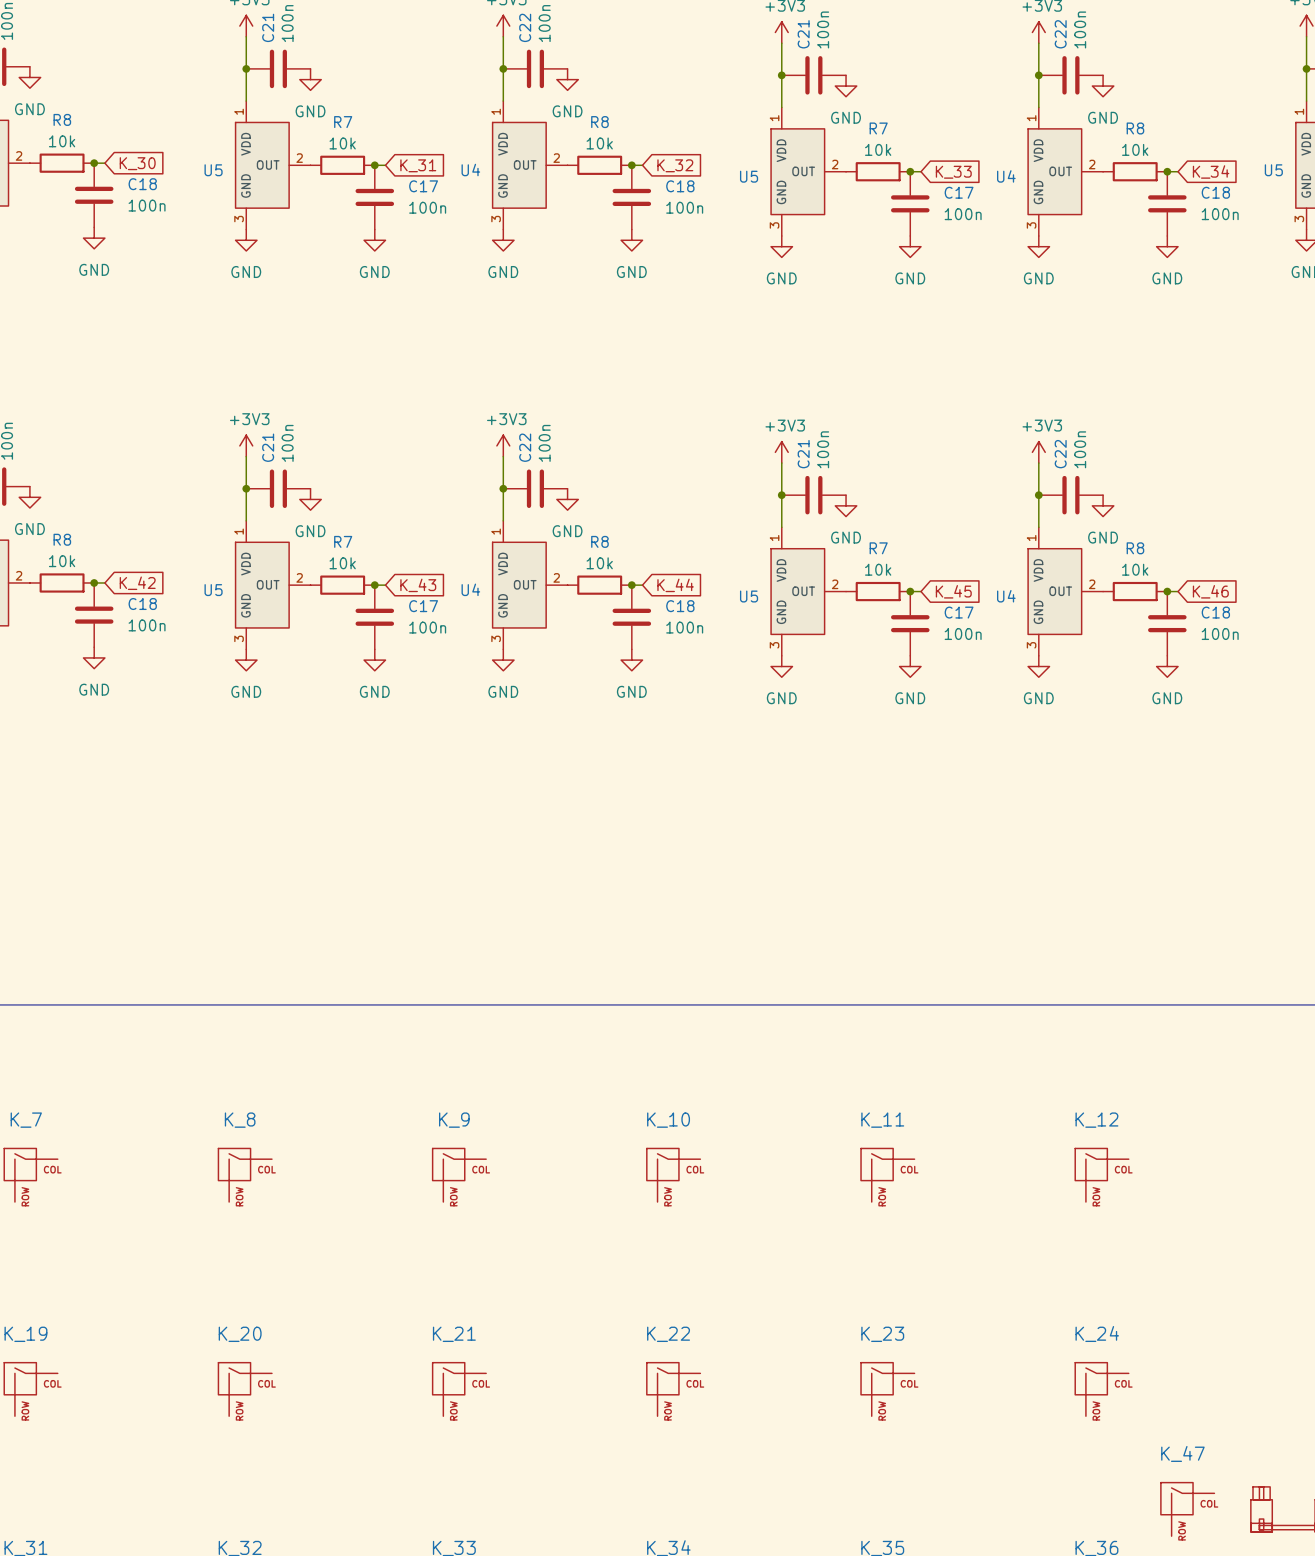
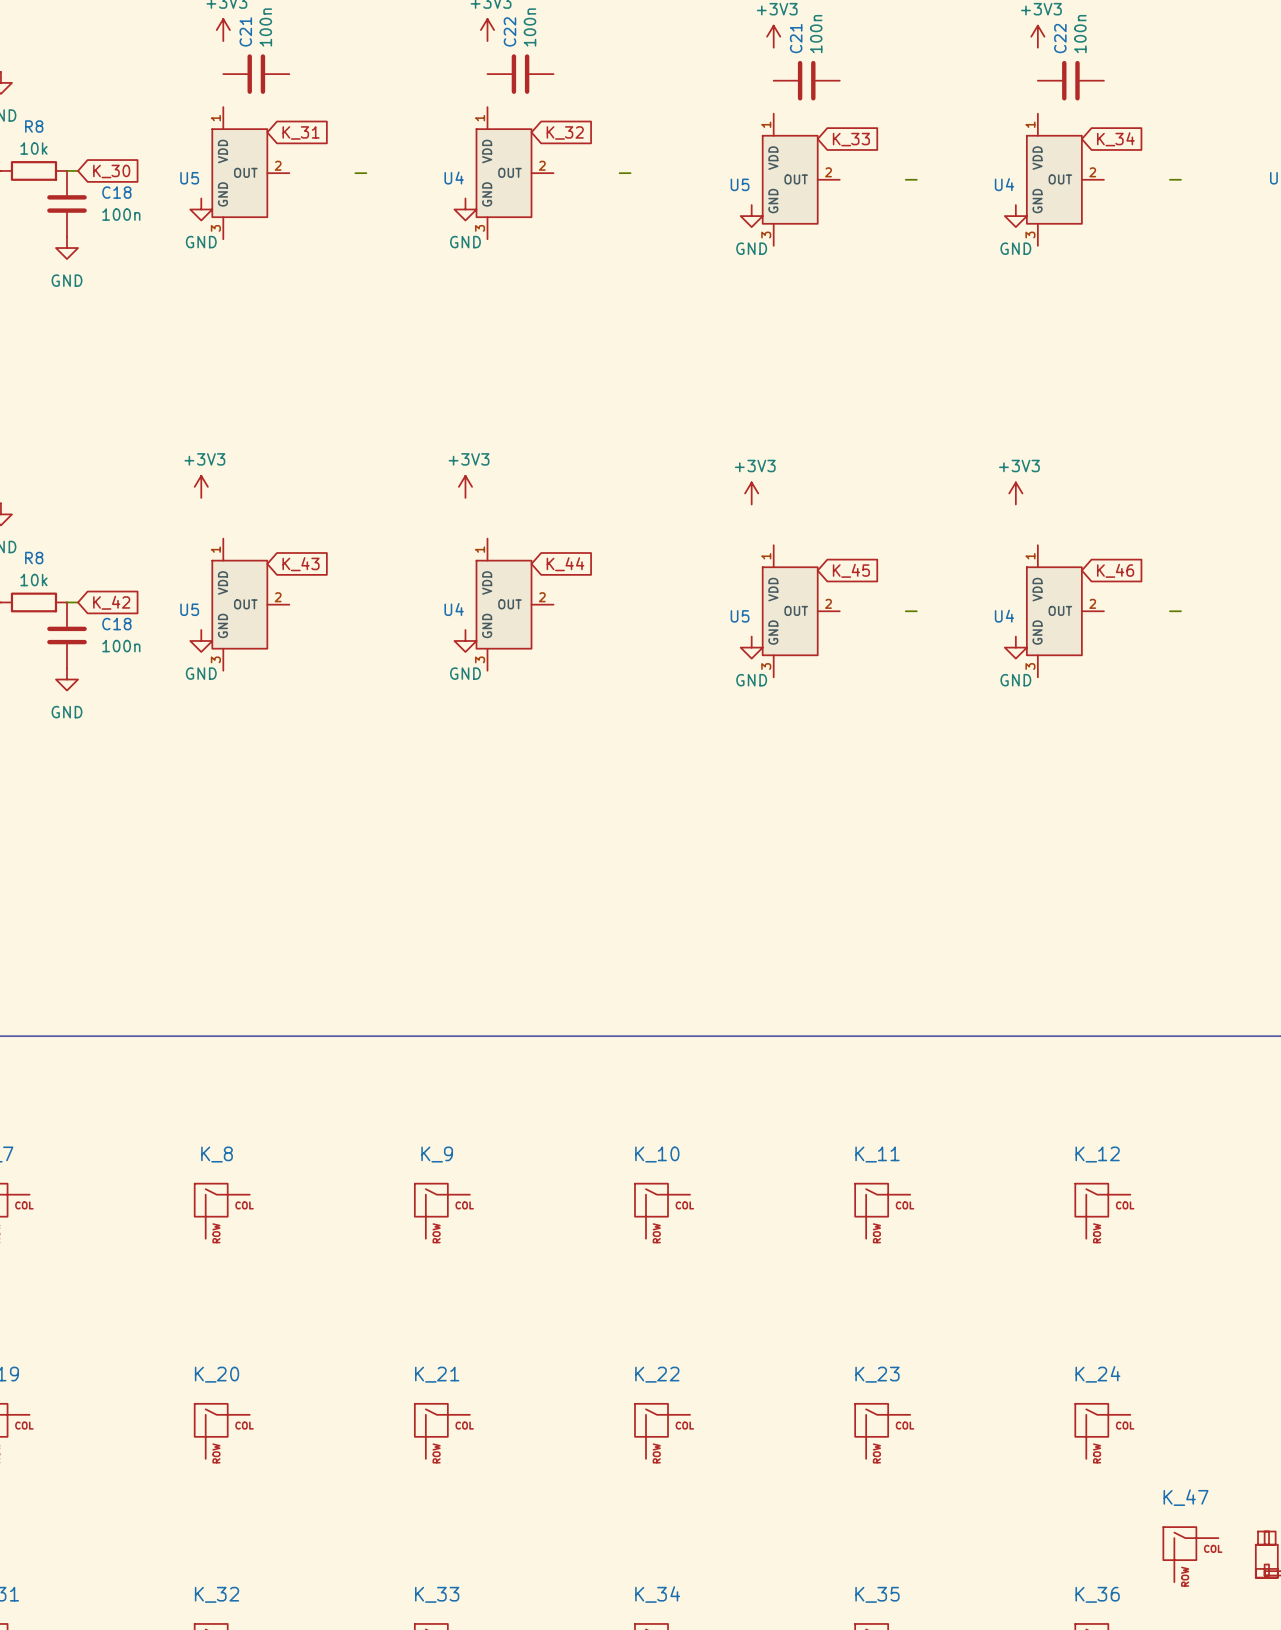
wire: (246, 36) (246, 101) -> none
wire: (503, 36) (503, 101) -> none
wire: (781, 43) (781, 107) -> none
wire: (1038, 43) (1038, 107) -> none
junction: (246, 68) -> none
junction: (503, 68) -> none
junction: (781, 75) -> none
junction: (1038, 75) -> none
power symbol: GND (310, 79) -> none
power symbol: GND (567, 79) -> none
power symbol: GND (846, 86) -> none
power symbol: GND (1103, 86) -> none
junction: (94, 163) -> none
R7: 10k (342, 165) -> none
junction: (374, 165) -> none
global label position: K_31 (418, 165) -> K_31 (301, 132)
R8: 10k (599, 165) -> none
junction: (631, 165) -> none
global label position: K_32 (675, 165) -> K_32 (565, 132)
R7: 10k (878, 171) -> none
junction: (910, 171) -> none
R8: 10k (1135, 171) -> none
junction: (1167, 171) -> none
global label position: K_34 (1211, 171) -> K_34 (1115, 139)
global label position: K_33 (953, 172) -> K_33 (851, 139)
C17: 100n (374, 197) -> none
C18: 100n (631, 197) -> none
C17: 100n (910, 203) -> none
C18: 100n (1167, 203) -> none
power symbol position: GND (246, 240) -> GND (201, 209)
power symbol: GND (374, 240) -> none
power symbol position: GND (503, 240) -> GND (465, 209)
power symbol: GND (631, 240) -> none
power symbol position: GND (781, 246) -> GND (751, 216)
power symbol: GND (910, 246) -> none
power symbol position: GND (1038, 246) -> GND (1015, 216)
power symbol: GND (1167, 246) -> none
power symbol position: +3V3 (246, 445) -> +3V3 (201, 486)
power symbol position: +3V3 (503, 445) -> +3V3 (465, 486)
power symbol position: +3V3 (781, 452) -> +3V3 (751, 493)
power symbol position: +3V3 (1038, 452) -> +3V3 (1015, 493)
wire: (246, 456) (246, 520) -> none
wire: (503, 456) (503, 520) -> none
wire: (781, 463) (781, 527) -> none
wire: (1038, 463) (1038, 527) -> none
junction: (246, 488) -> none
C21: 100n (278, 488) -> none
junction: (503, 488) -> none
C22: 100n (535, 488) -> none
junction: (781, 495) -> none
C21: 100n (813, 495) -> none
junction: (1038, 495) -> none
C22: 100n (1070, 495) -> none
power symbol: GND (310, 499) -> none
power symbol: GND (567, 499) -> none
power symbol: GND (846, 505) -> none
power symbol: GND (1103, 505) -> none
junction: (94, 582) -> none
R7: 10k (342, 585) -> none
wire: (374, 585) (385, 585) -> none
junction: (374, 585) -> none
global label position: K_43 (418, 585) -> K_43 (301, 564)
R8: 10k (599, 585) -> none
wire: (631, 585) (642, 585) -> none
junction: (631, 585) -> none
global label position: K_44 (675, 585) -> K_44 (565, 564)
R7: 10k (878, 591) -> none
junction: (910, 591) -> none
global label position: K_45 (953, 591) -> K_45 (851, 570)
R8: 10k (1135, 591) -> none
junction: (1167, 591) -> none
global label position: K_46 (1210, 591) -> K_46 (1115, 570)
C17: 100n (374, 617) -> none
C18: 100n (631, 617) -> none
C17: 100n (910, 623) -> none
C18: 100n (1167, 623) -> none
power symbol position: GND (246, 660) -> GND (201, 640)
power symbol: GND (374, 660) -> none
power symbol position: GND (503, 660) -> GND (465, 640)
power symbol: GND (631, 660) -> none
power symbol position: GND (781, 666) -> GND (751, 647)
power symbol: GND (910, 666) -> none
power symbol position: GND (1038, 666) -> GND (1015, 647)
power symbol: GND (1167, 666) -> none

